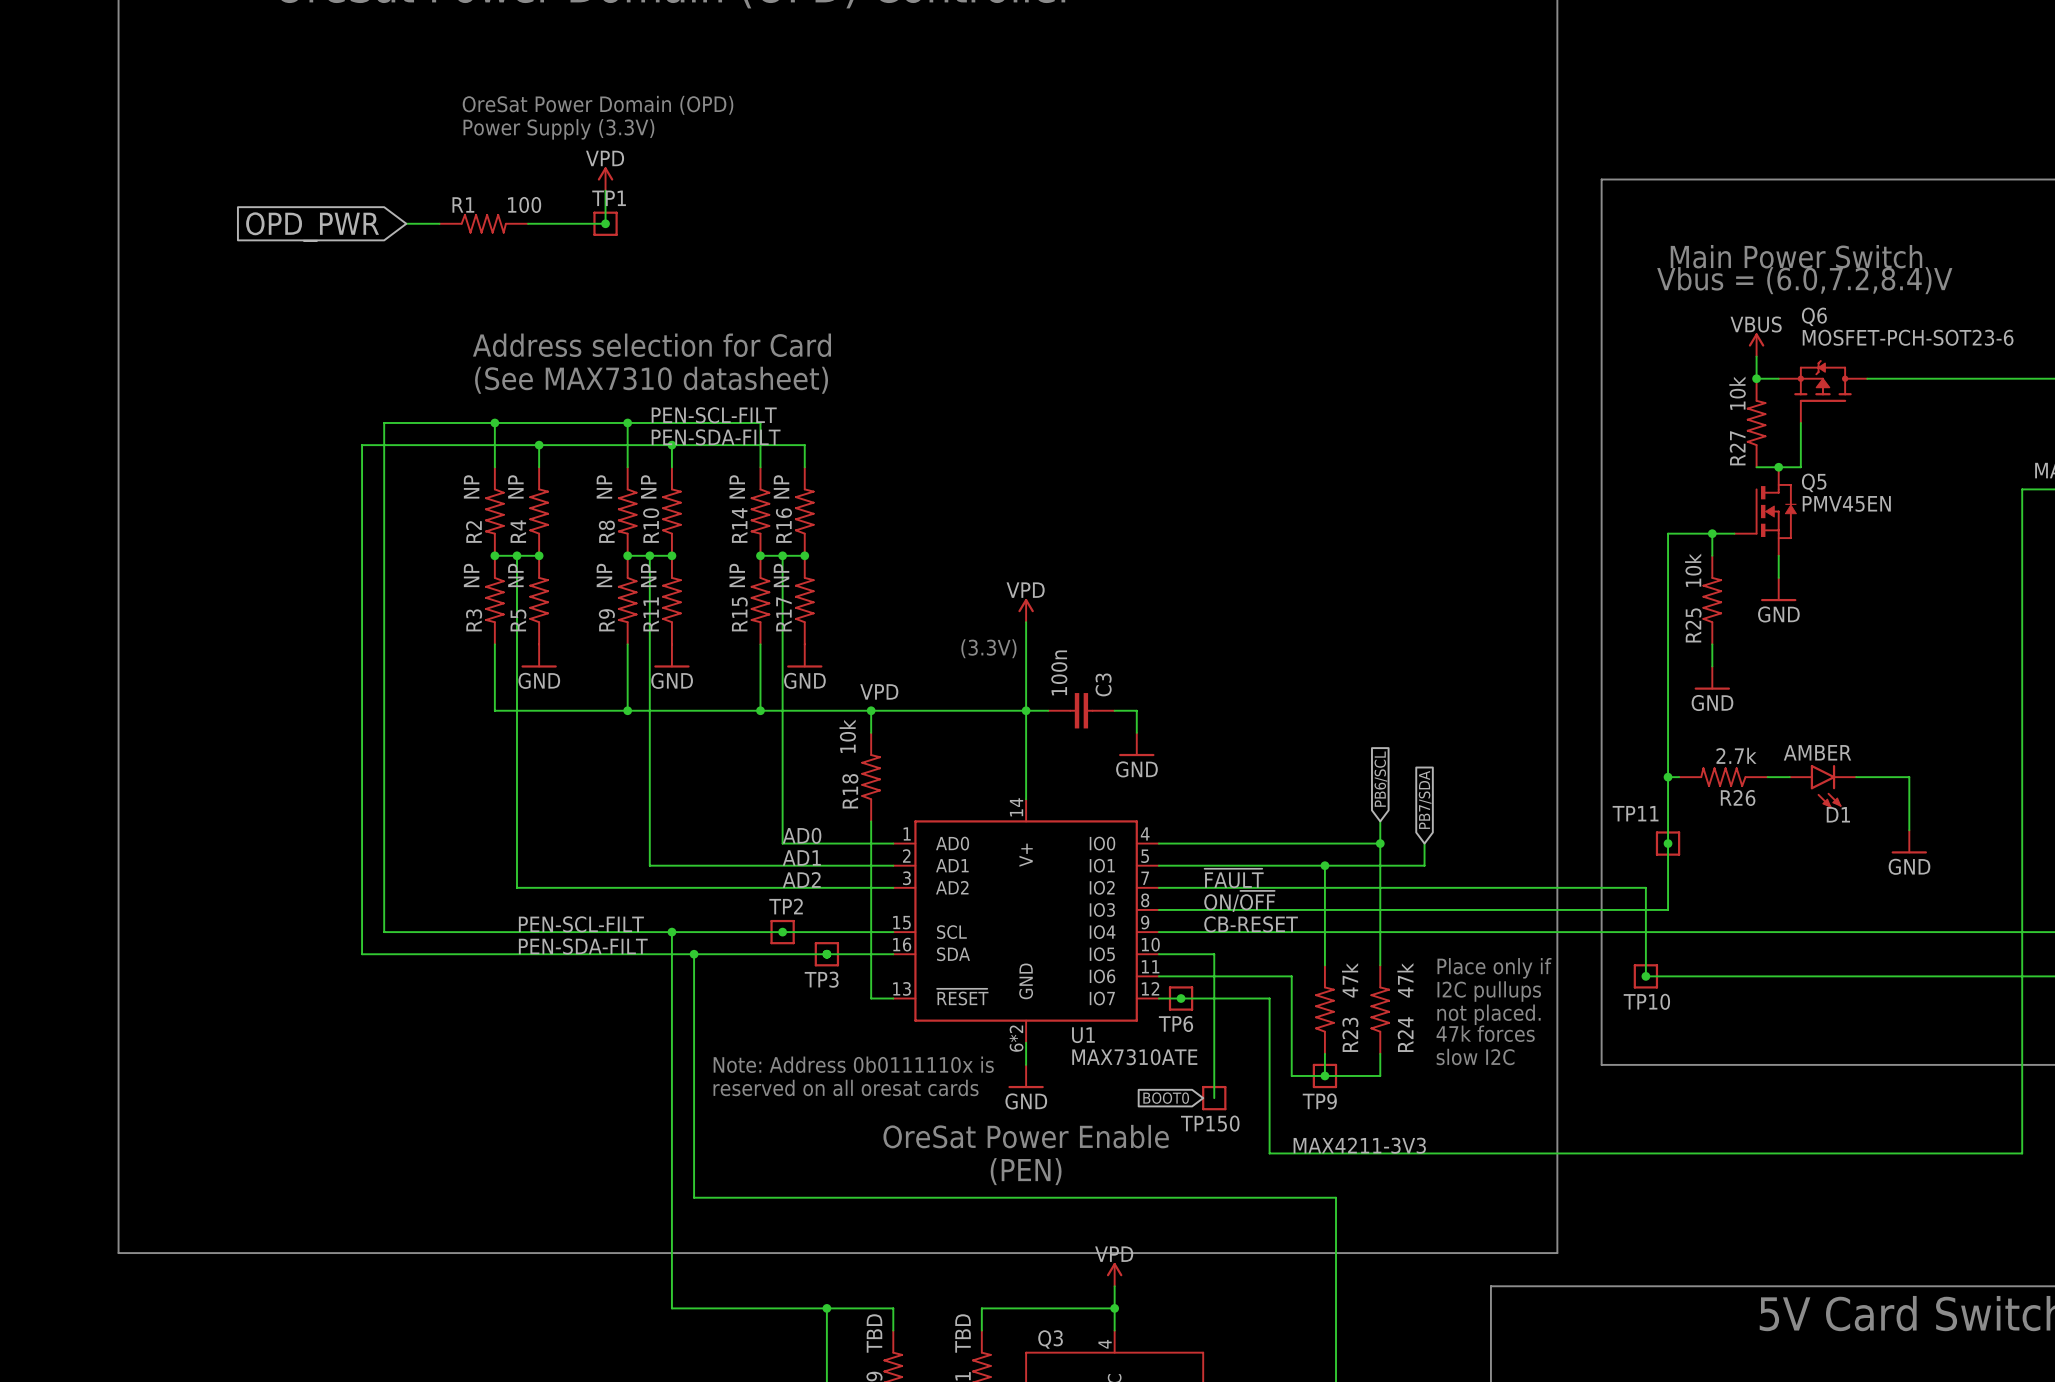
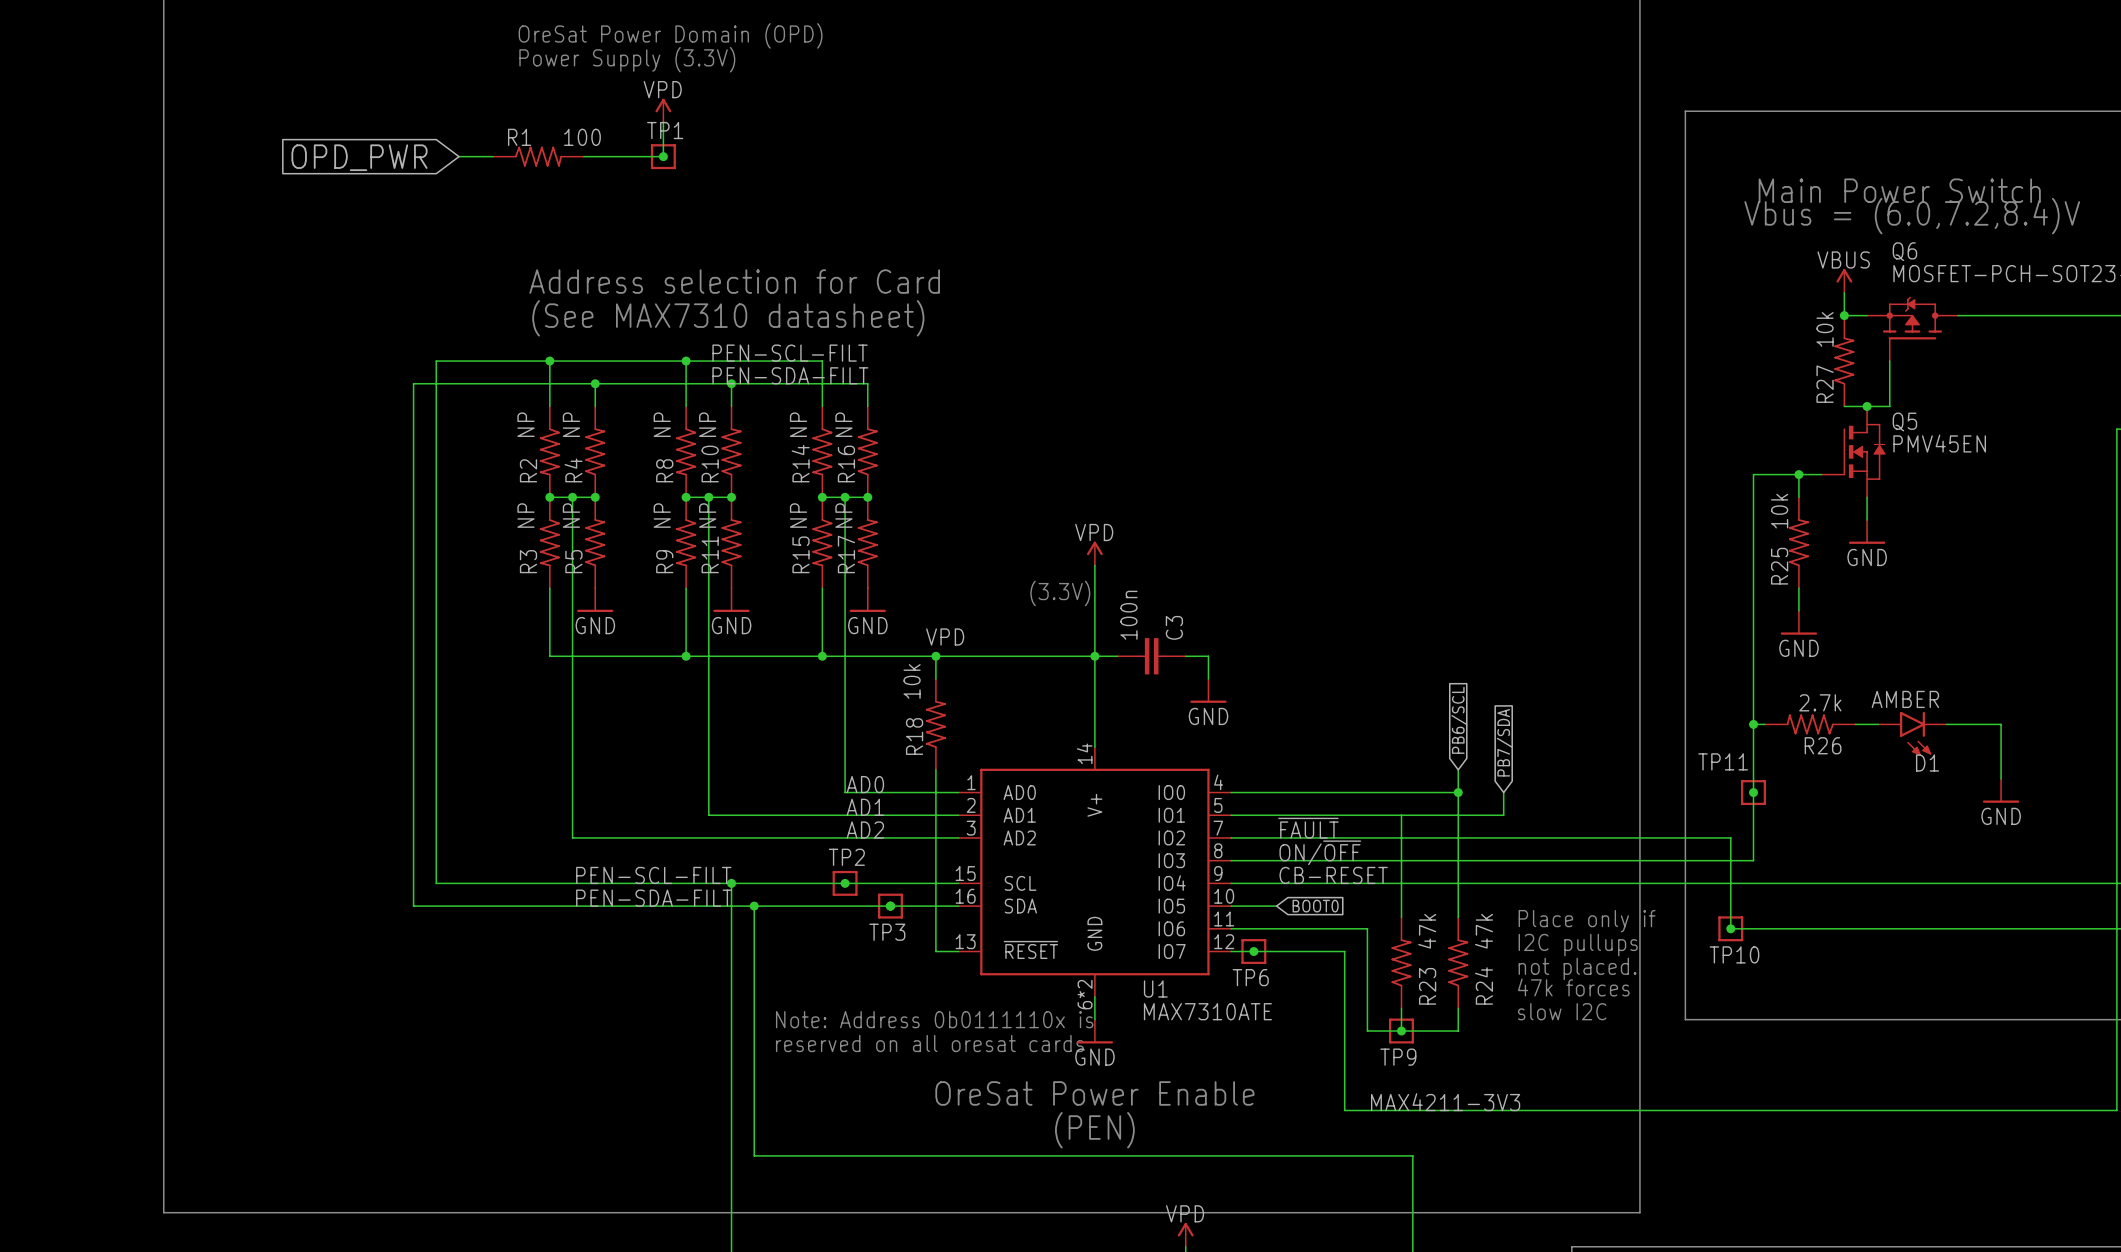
junction: (1324, 865) -> none
wire: (1203, 954) (1214, 954) (1214, 1098) -> none
global label rotation: 0° (1166, 1098) -> 180° (1315, 906)
global label position: BOOT0 (1166, 1098) -> BOOT0 (1315, 906)
TP150: (1214, 1098) -> none

